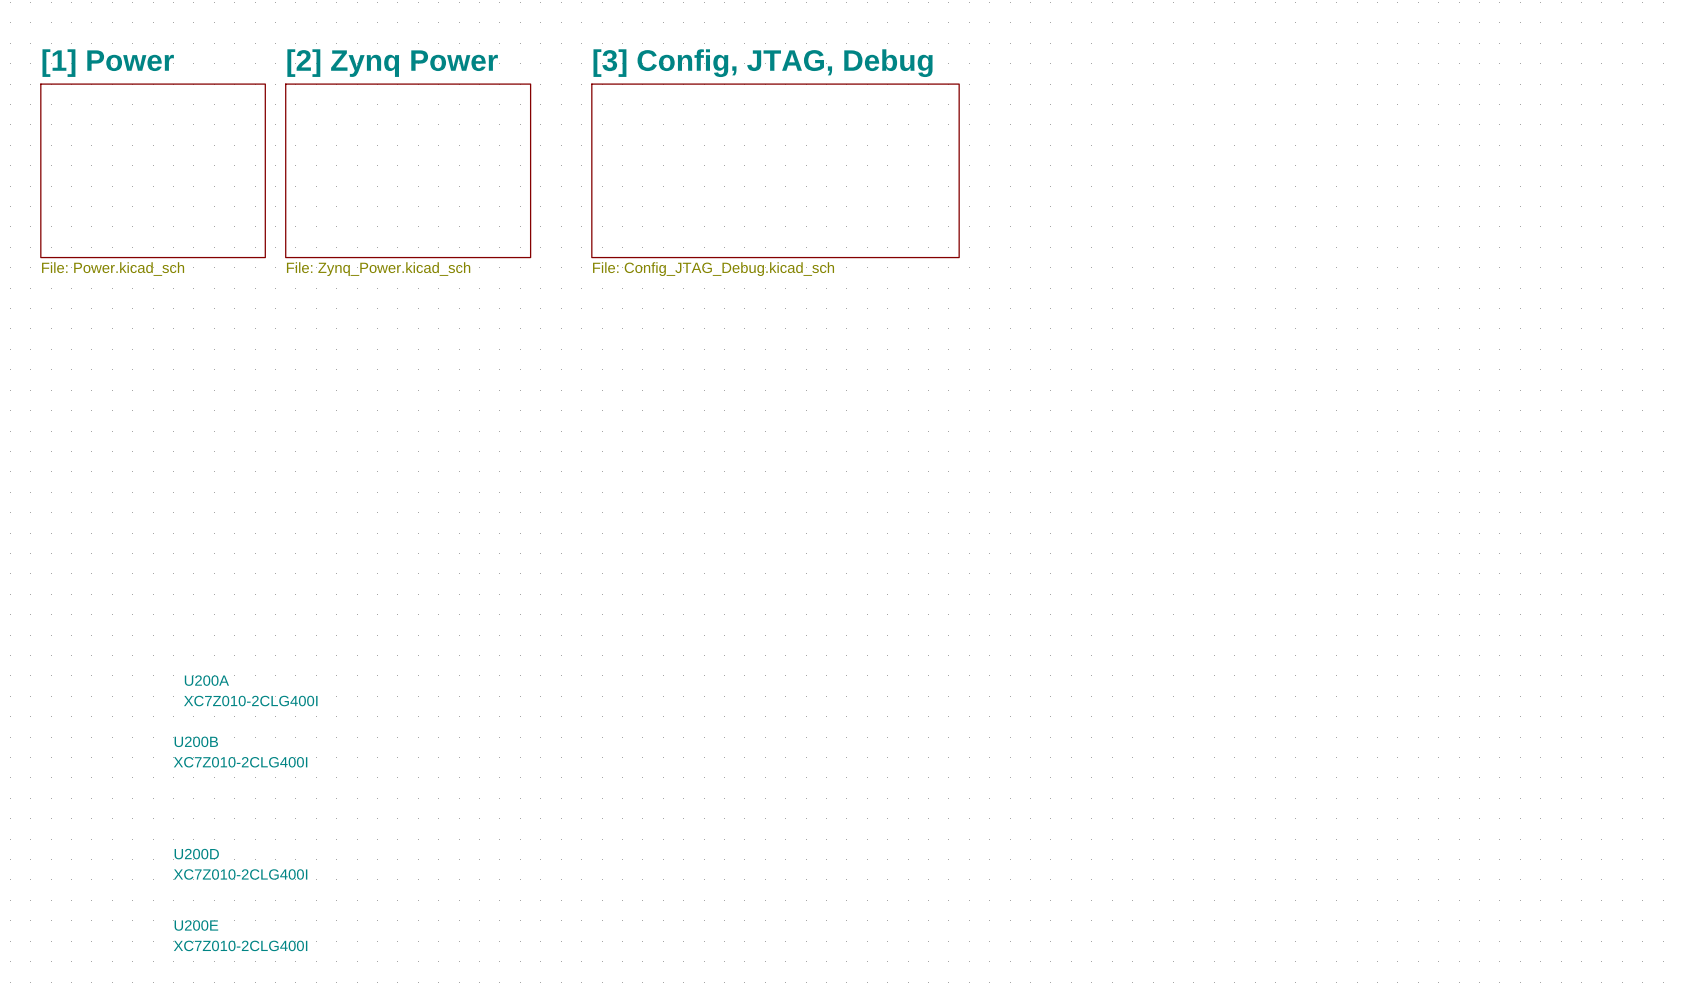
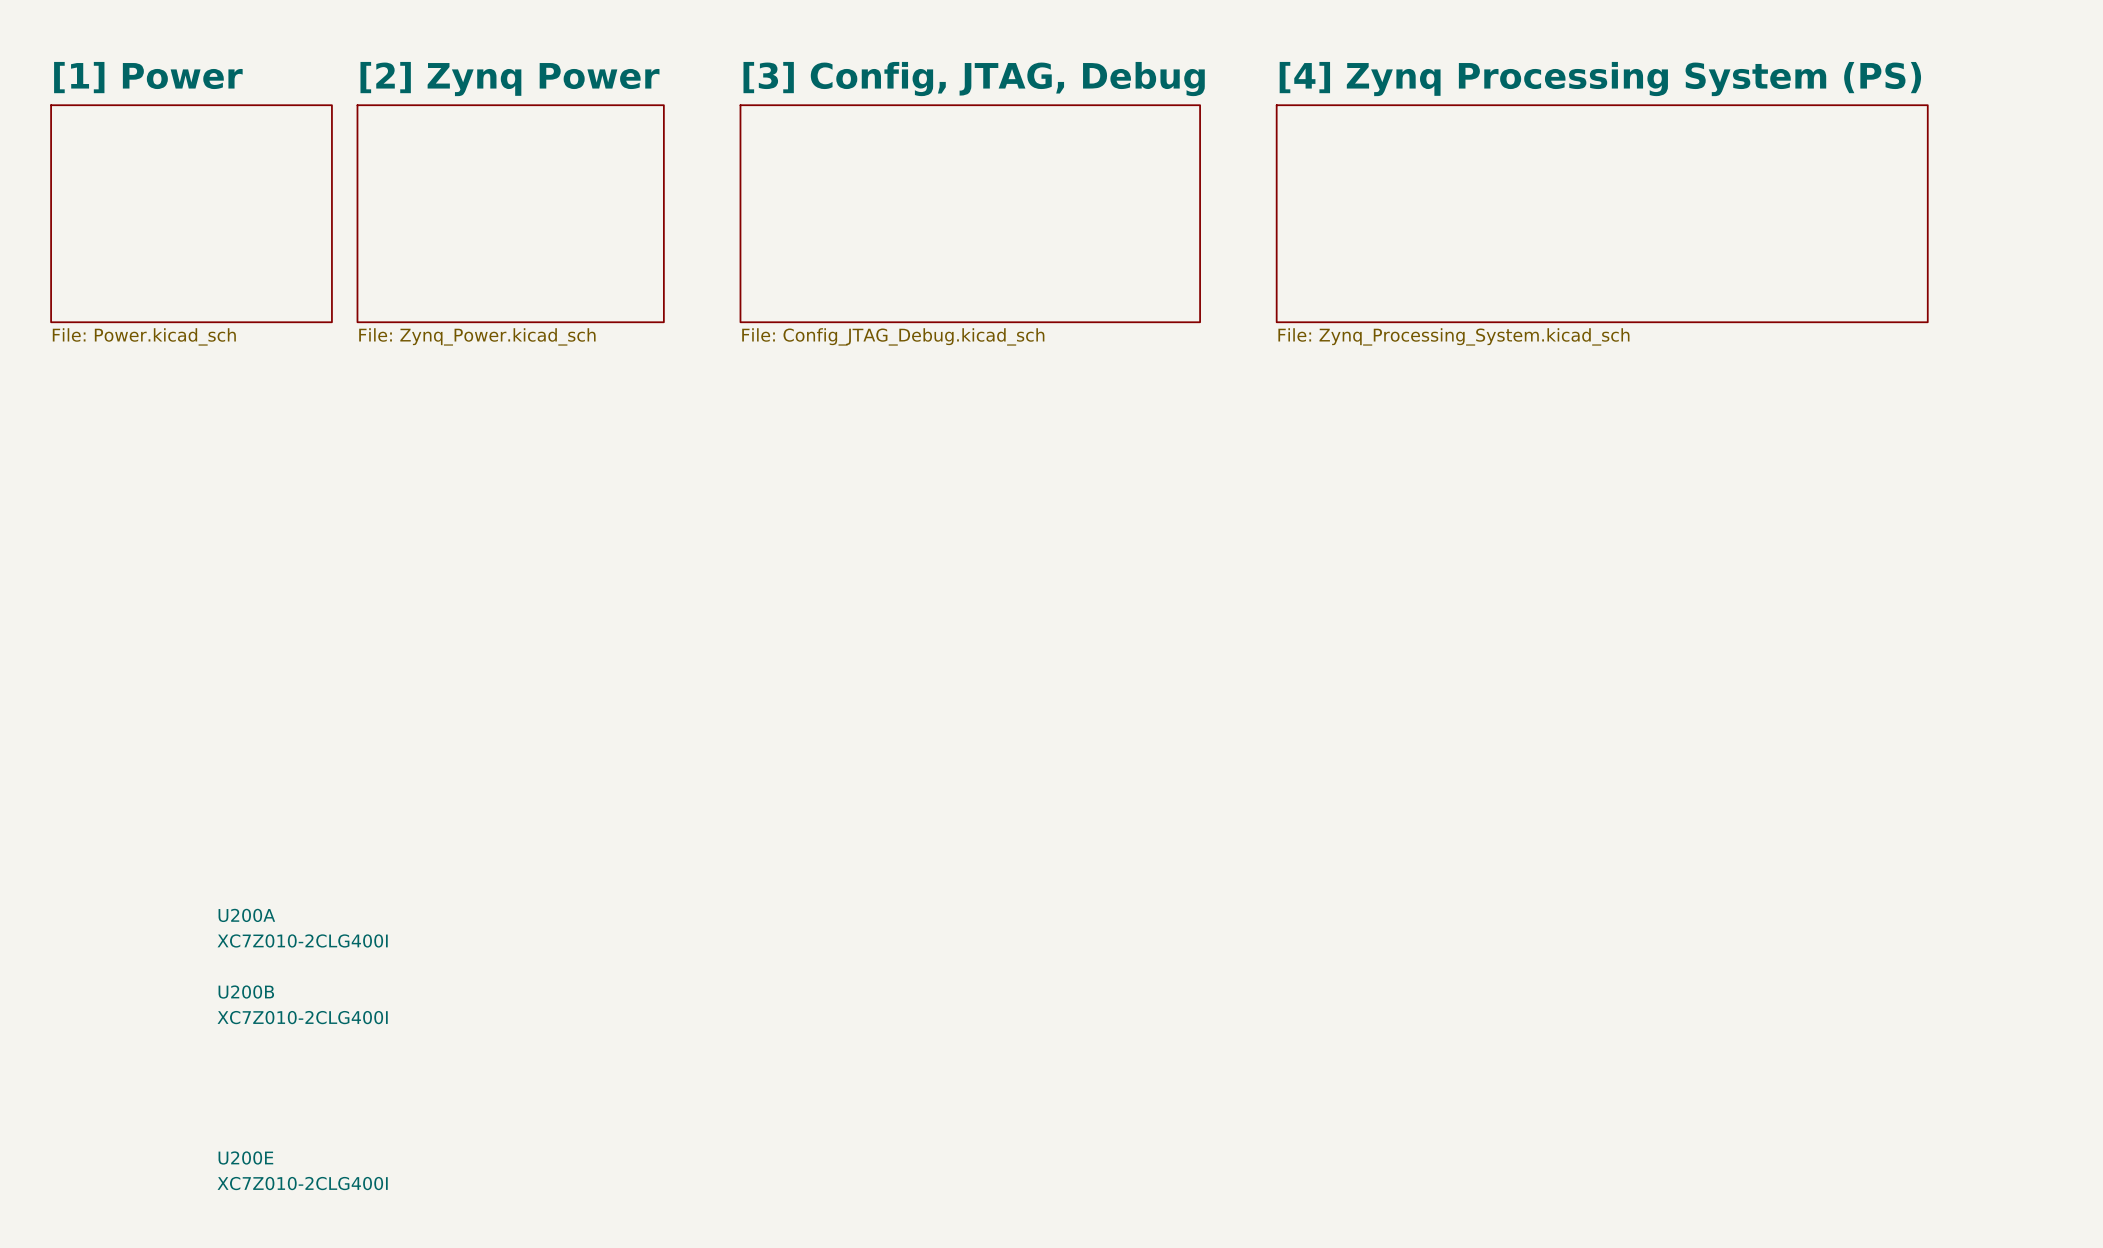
sheet [4] Zynq Processing System (PS): none -> File: Zynq_Processing_System.kicad_sch (1602, 213)
U200A position: (250, 690) -> (302, 928)
U200B position: (240, 752) -> (302, 1004)
U200D: XC7Z010-2CLG400I (240, 864) -> none

